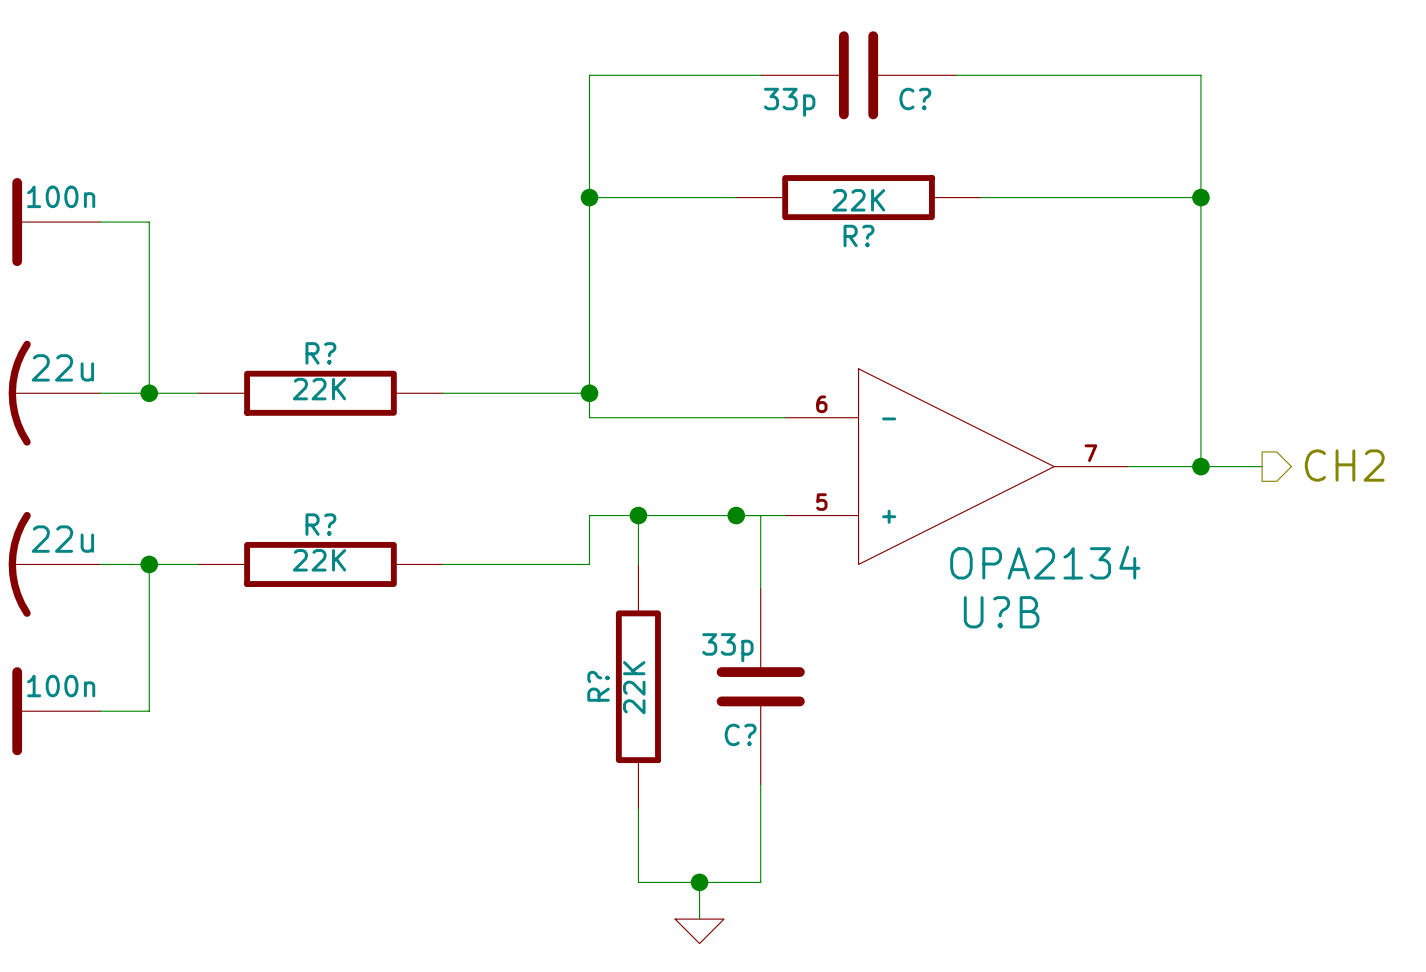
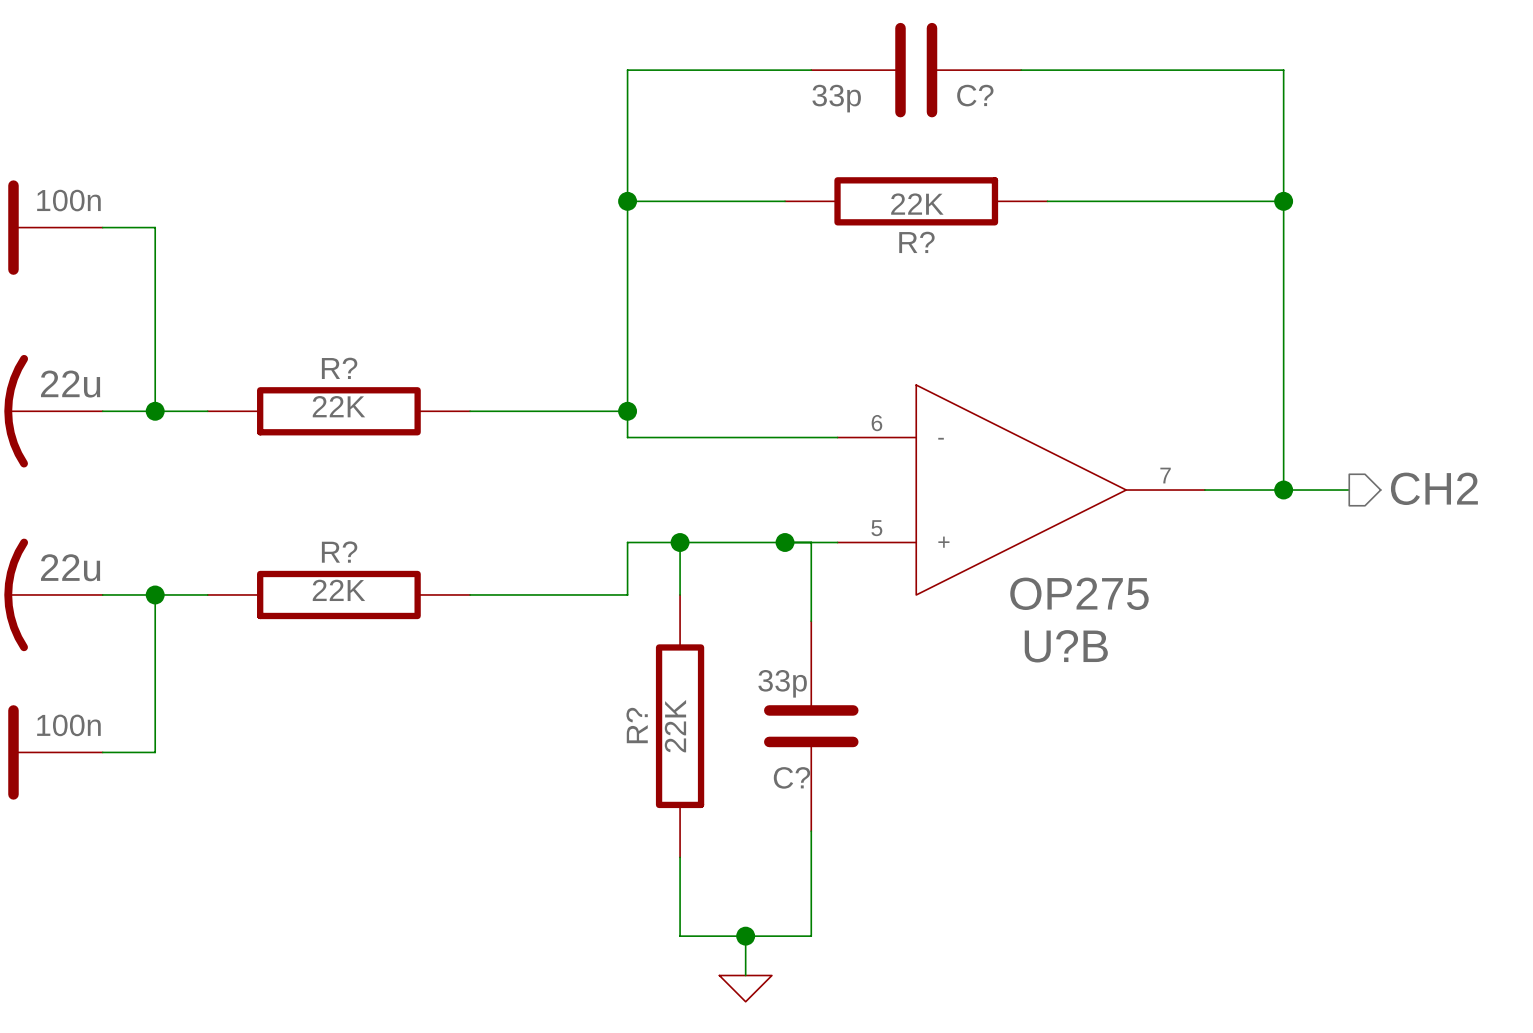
U?B value: OPA2134 (1045, 562) -> OP275 (1079, 593)

